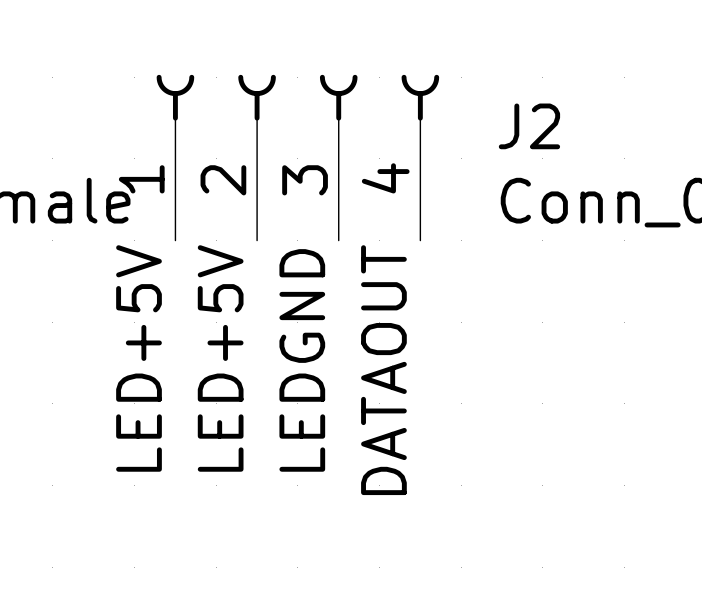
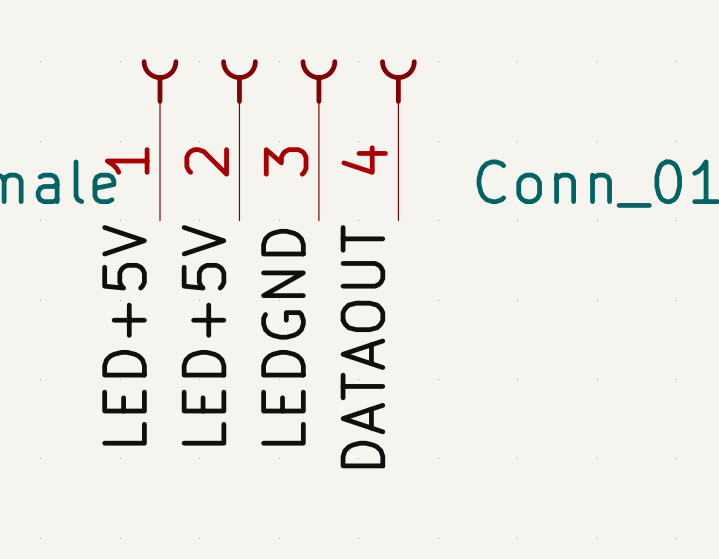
J2 name: J2 (529, 126) -> none

